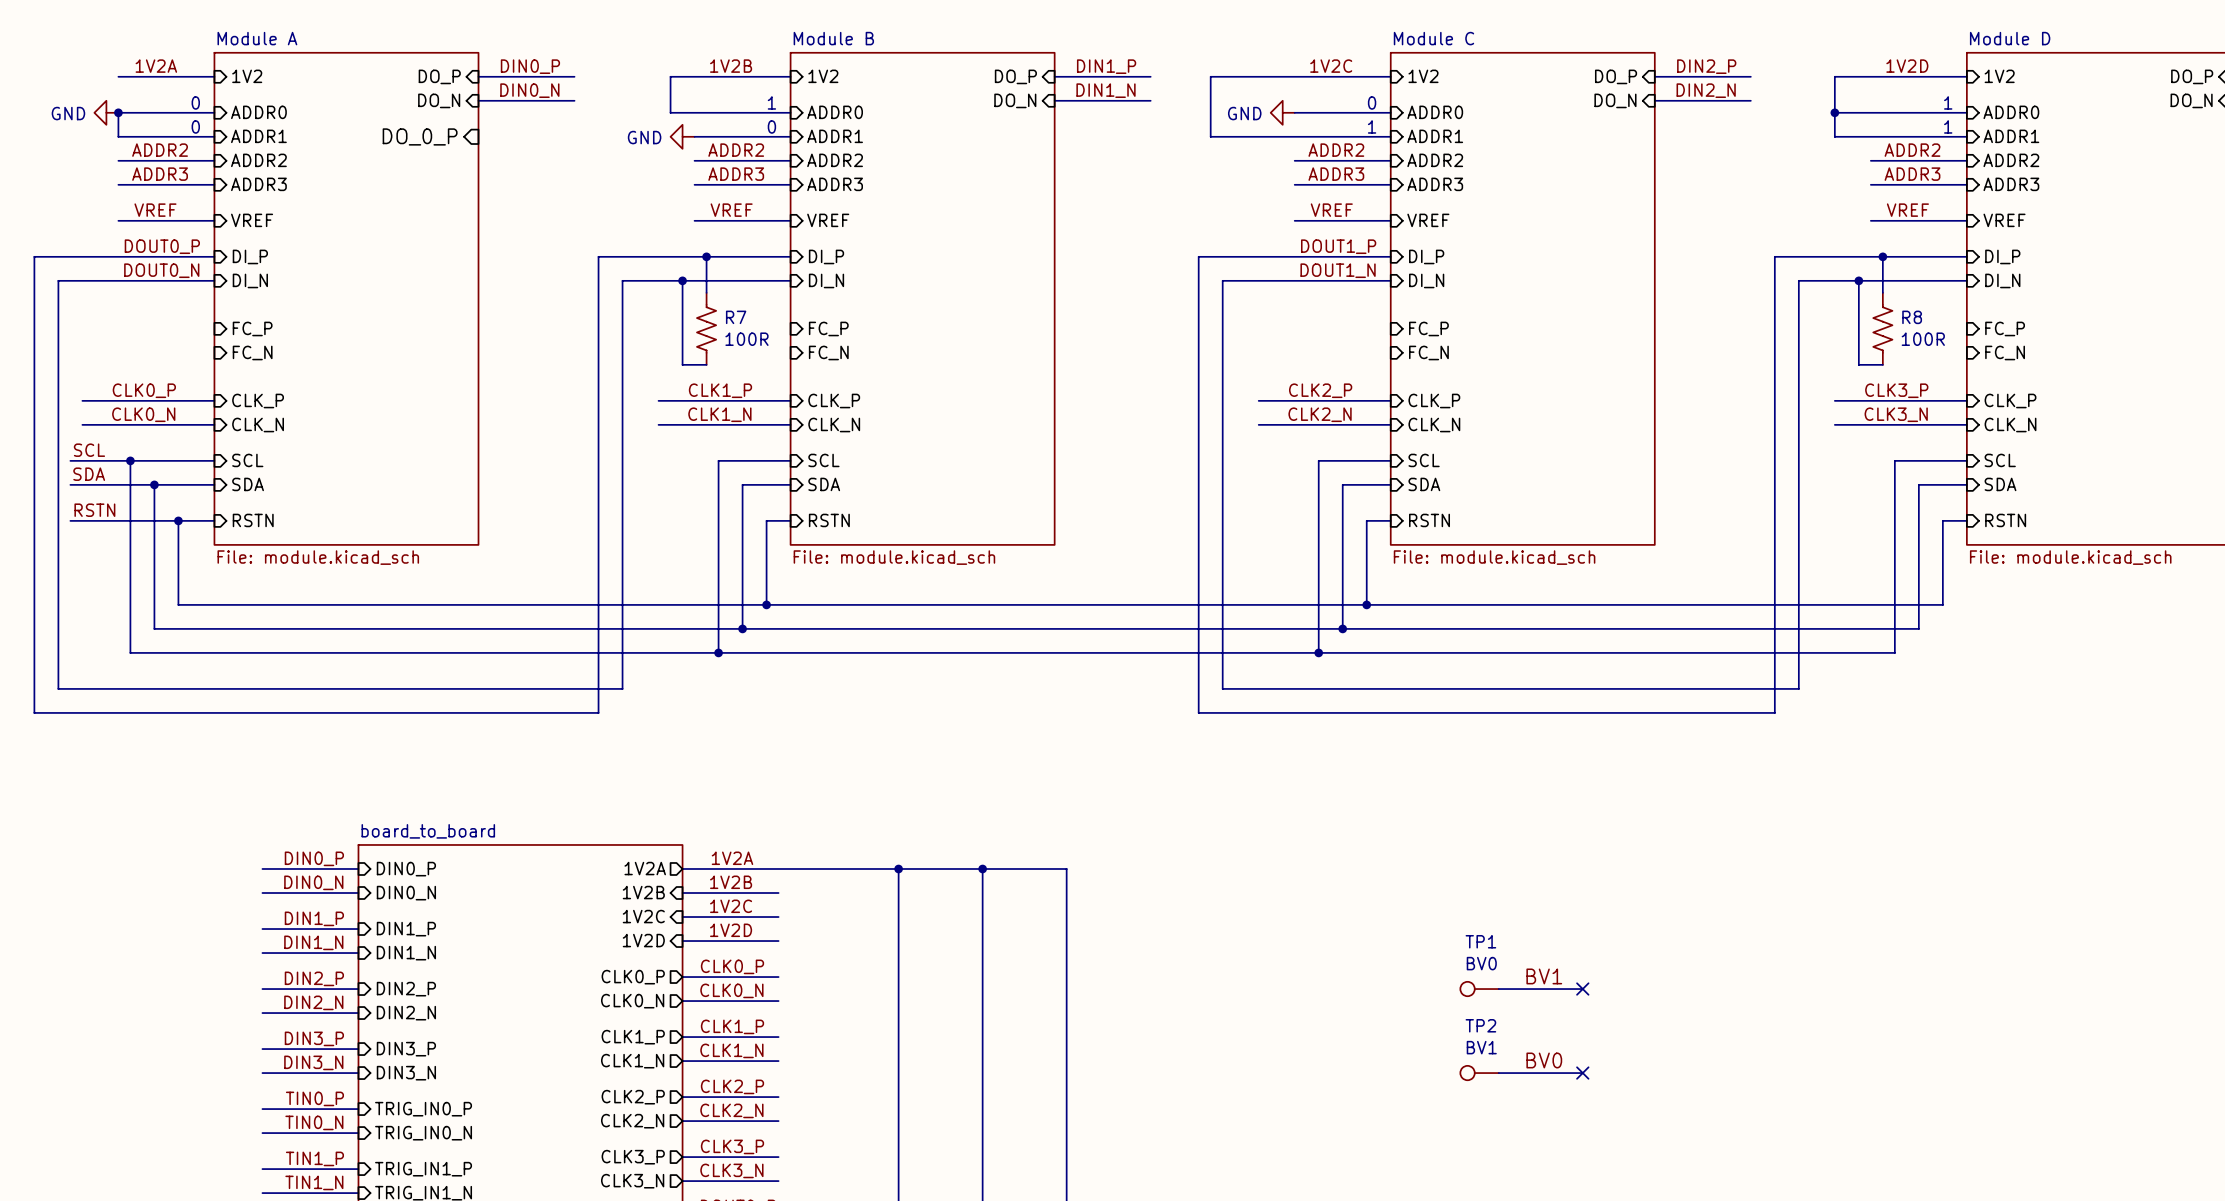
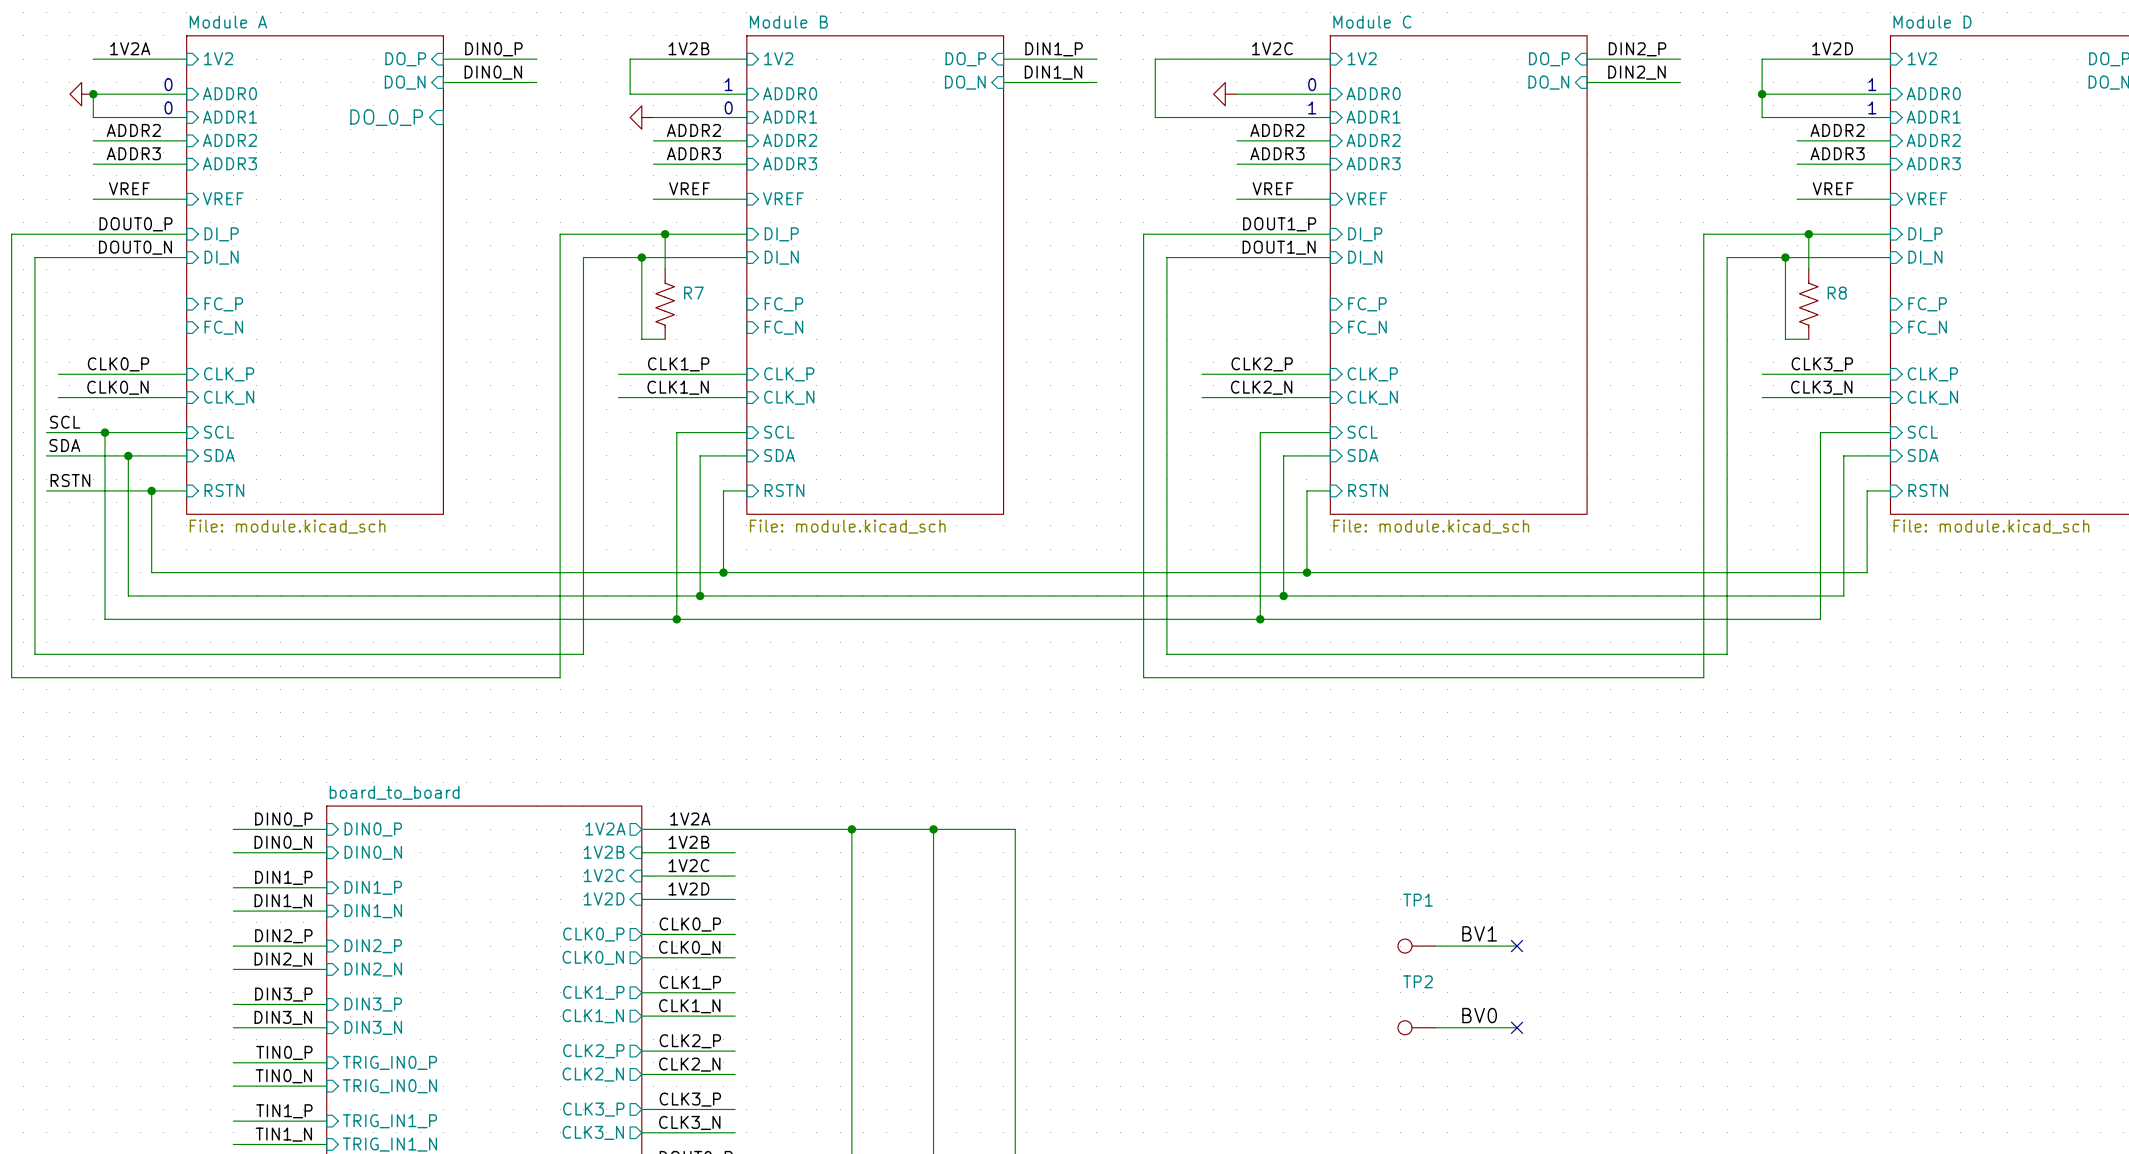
power symbol text: GND (68, 113) -> none
power symbol text: GND (1244, 113) -> none
power symbol text: GND (644, 137) -> none
R7 value: 100R (746, 339) -> none
R8 value: 100R (1923, 339) -> none
TP1 value: BV0 (1481, 963) -> none
TP2 value: BV1 (1481, 1047) -> none

